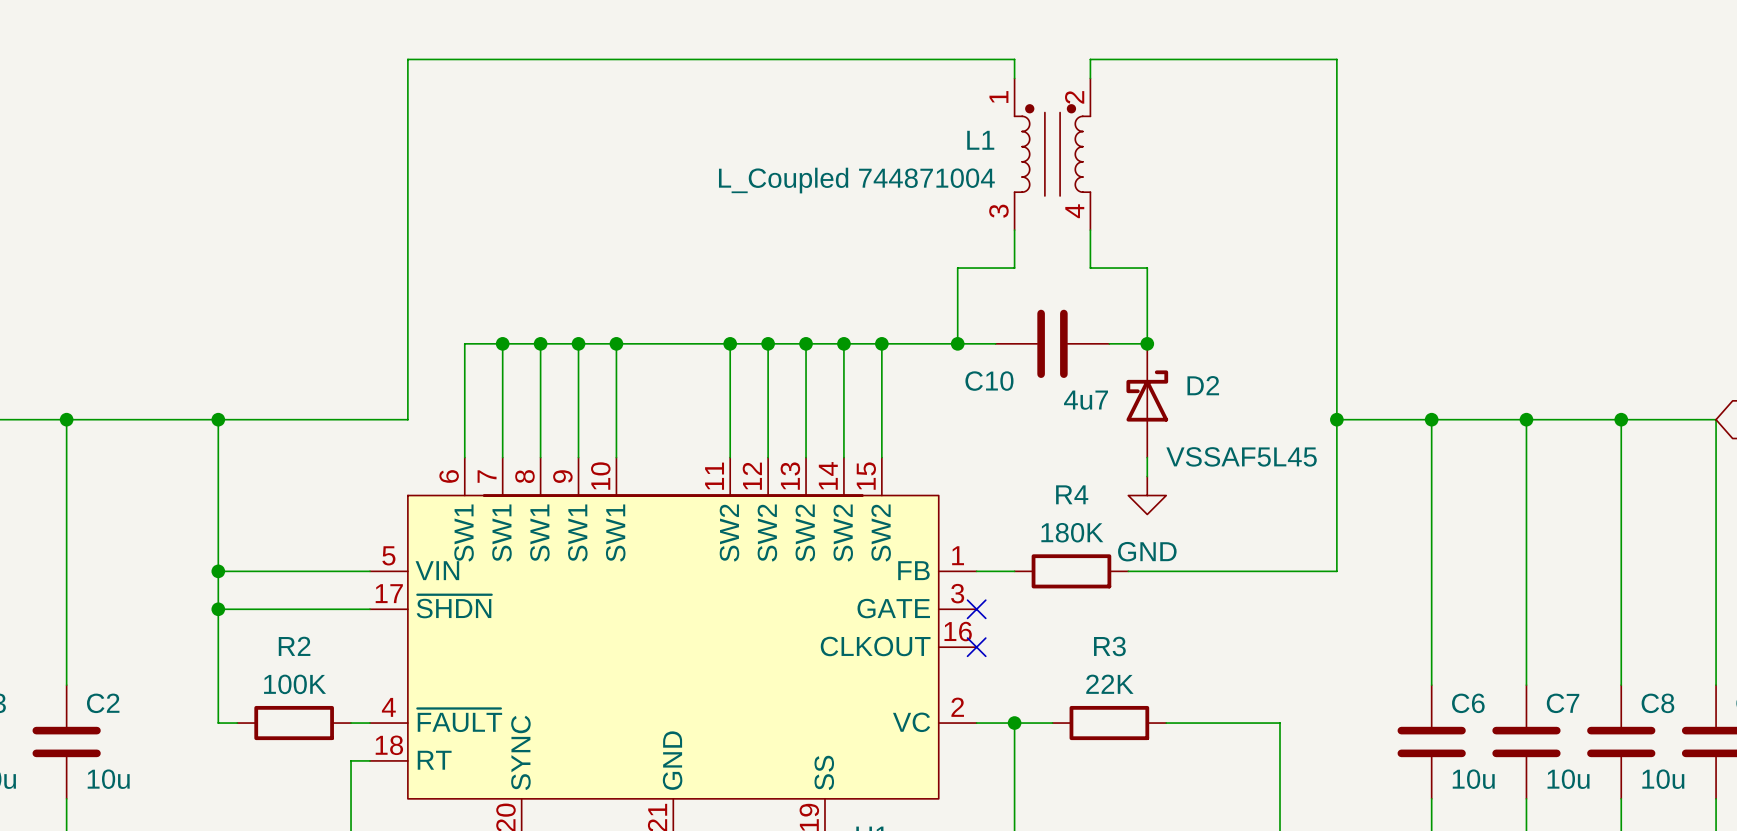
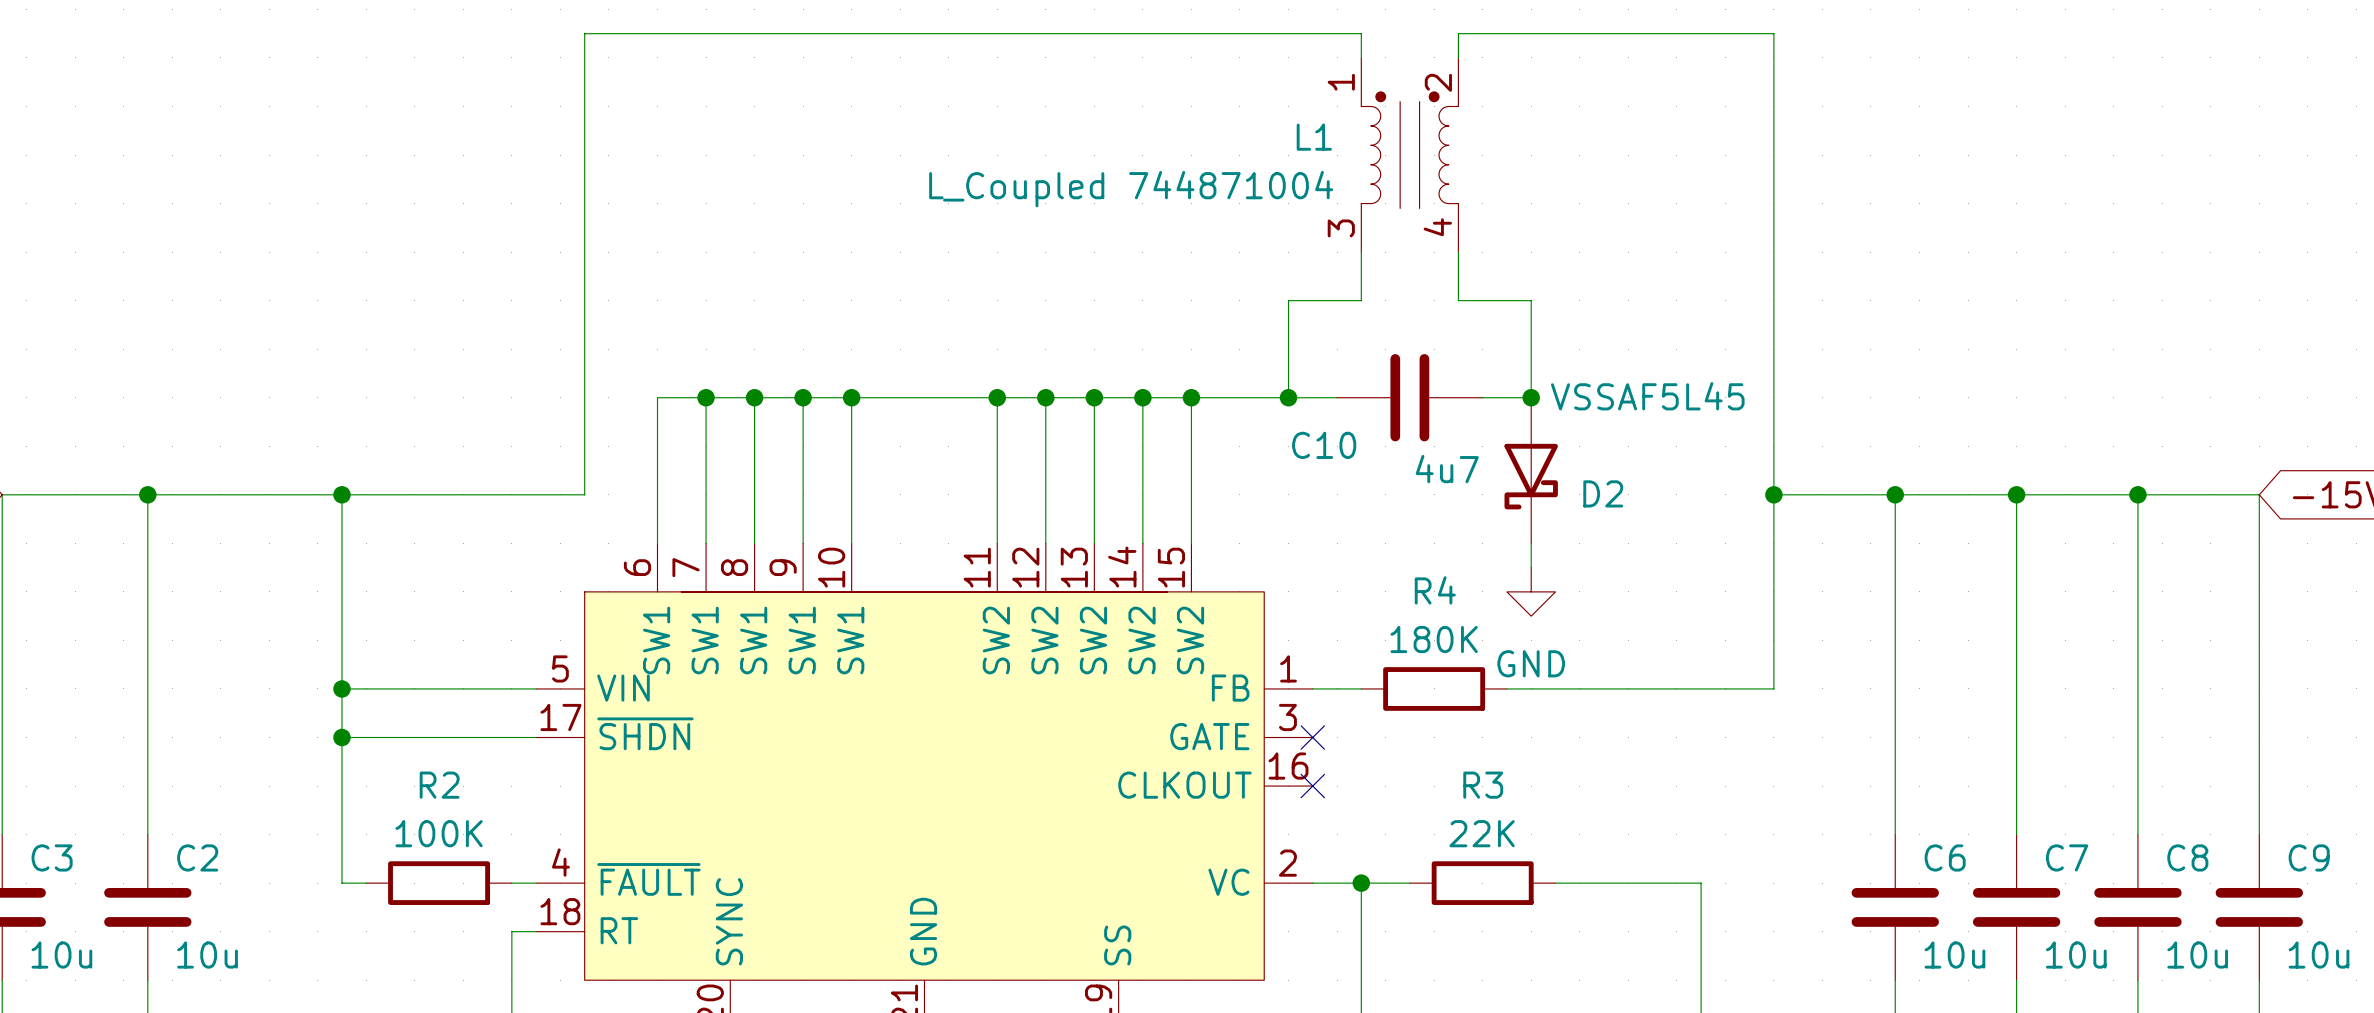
D2 name position: D2 (1203, 385) -> D2 (1603, 493)
D2 rotation: 0° (1147, 395) -> 180° (1531, 476)
D2 value position: VSSAF5L45 (1241, 456) -> VSSAF5L45 (1647, 396)

